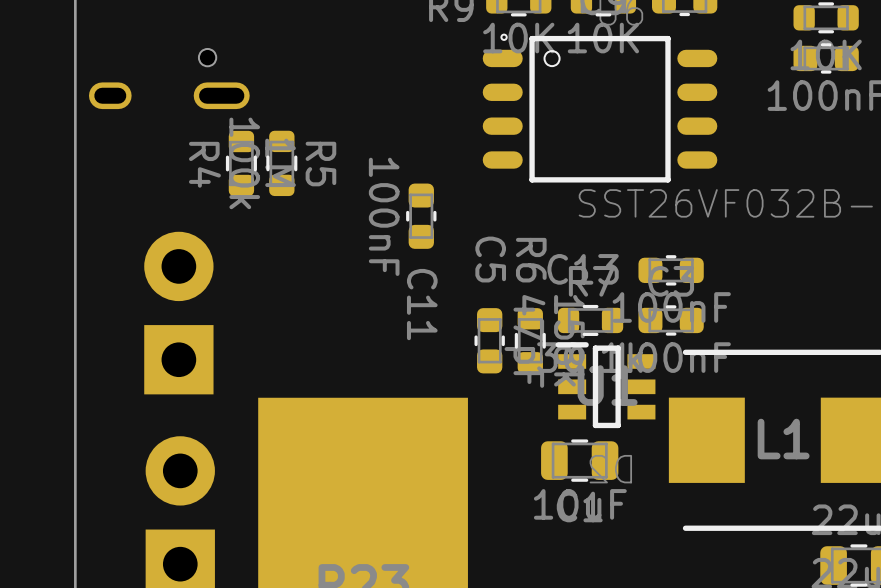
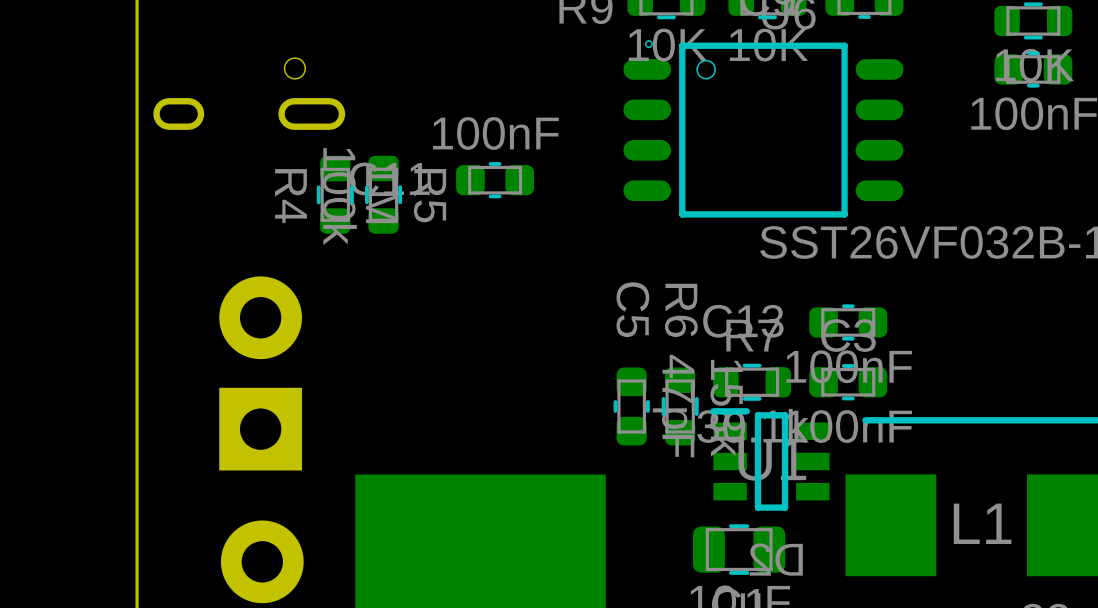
C11 rotation: 0° (421, 216) -> 90° clockwise (495, 180)
C11 position: (421, 216) -> (495, 180)

